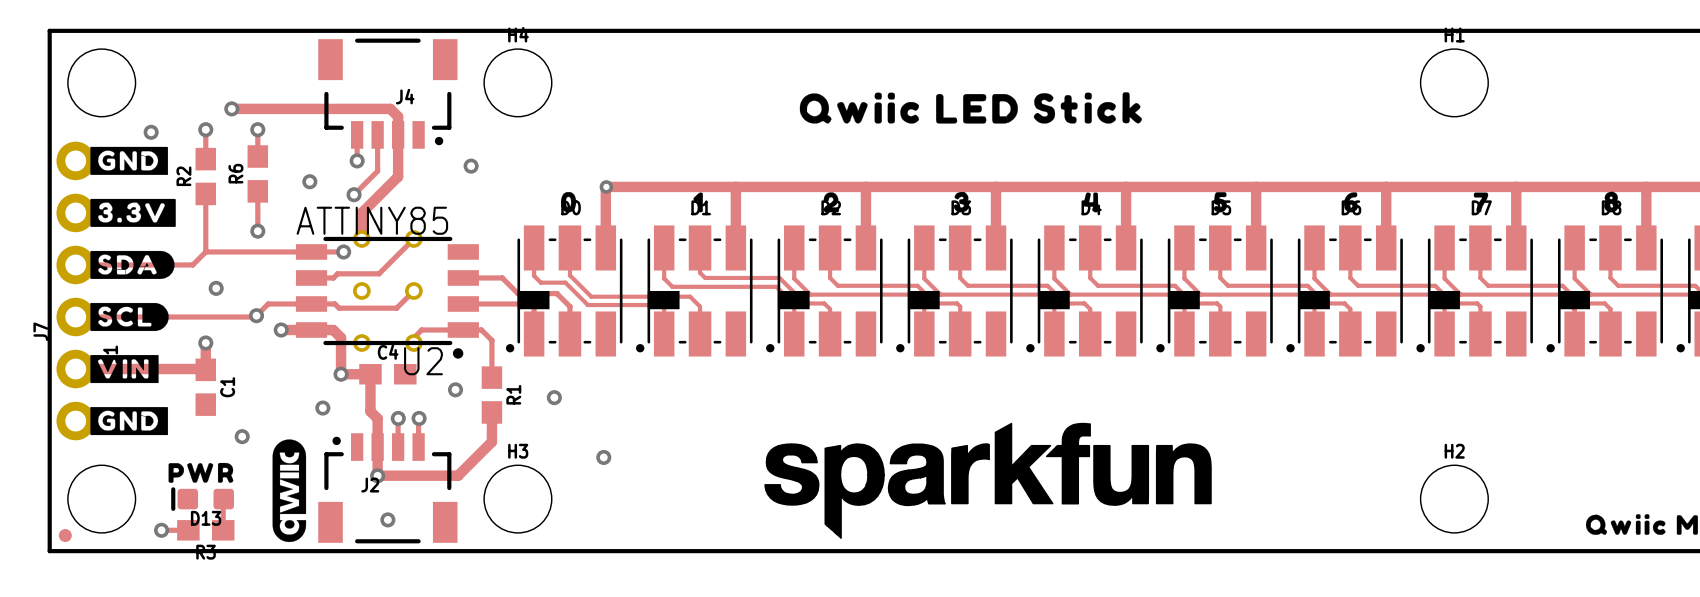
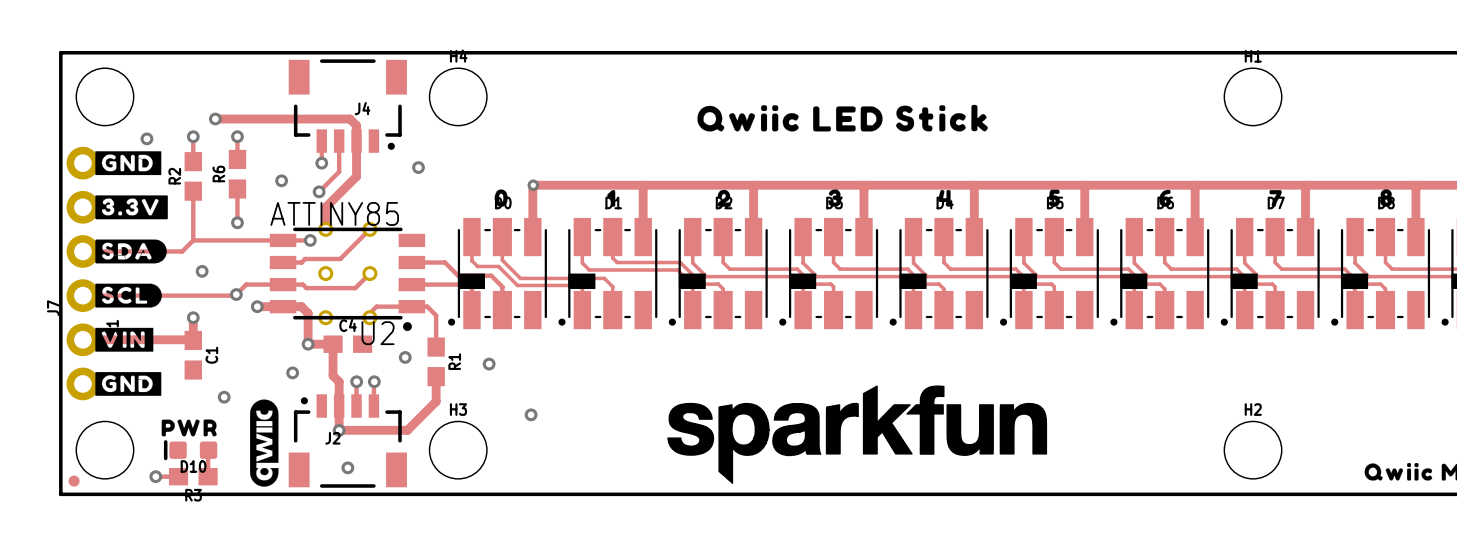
D13 name: D13 (206, 518) -> D10 (193, 466)

